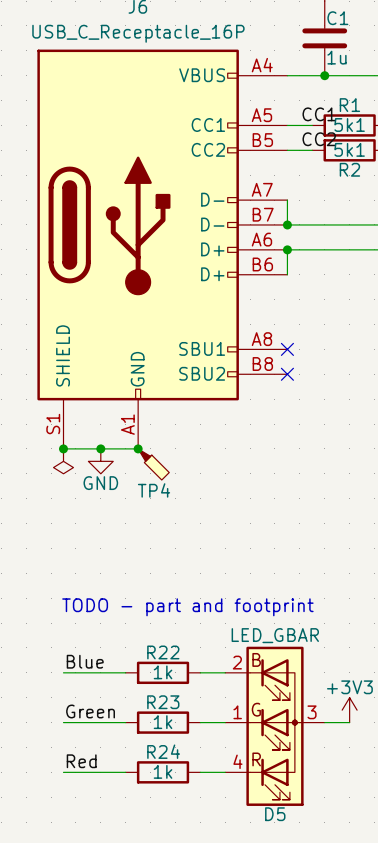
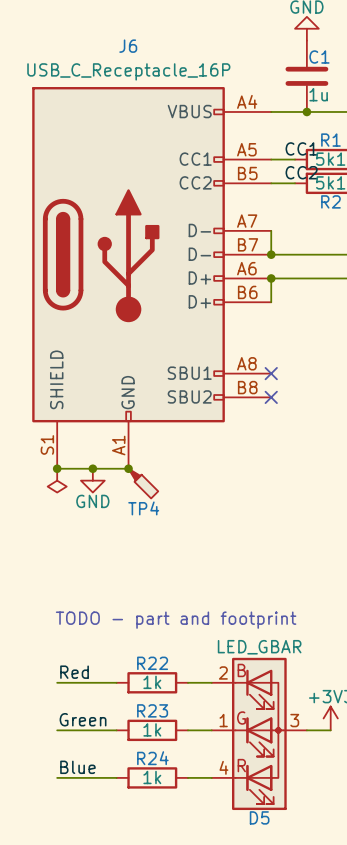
label: Blue (85, 661) -> Red (74, 672)
label: Red (81, 761) -> Blue (77, 767)

